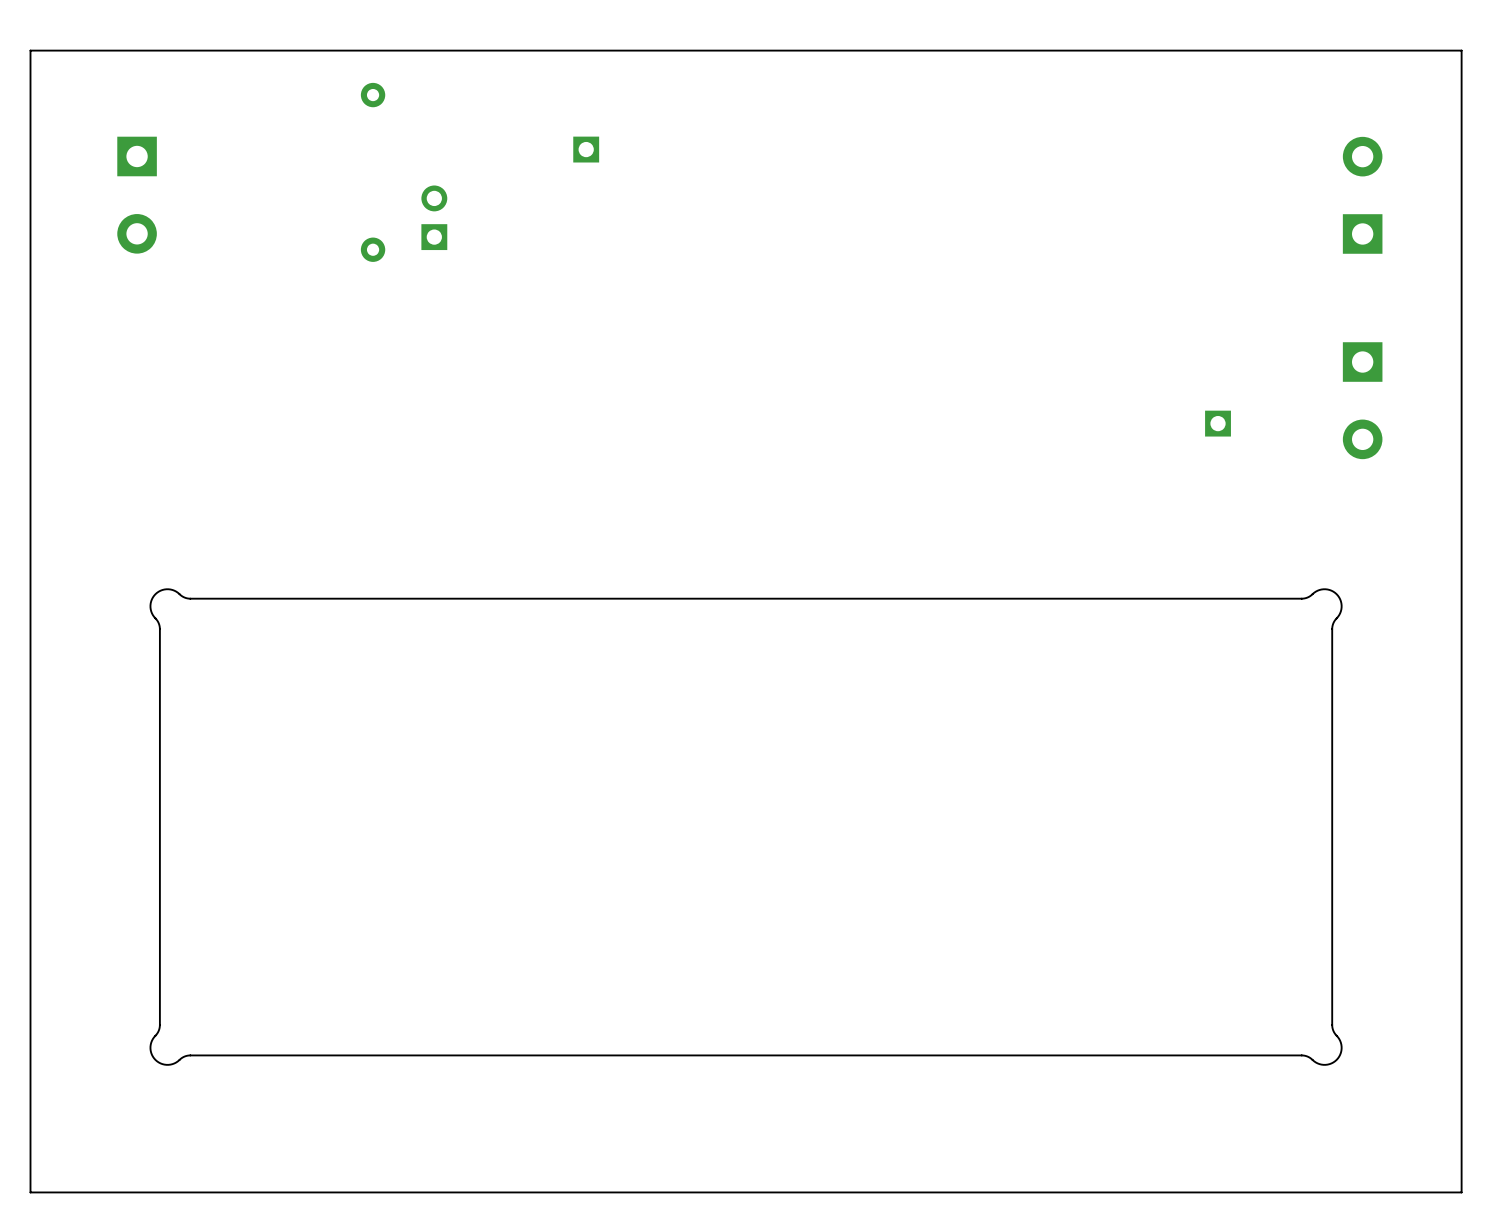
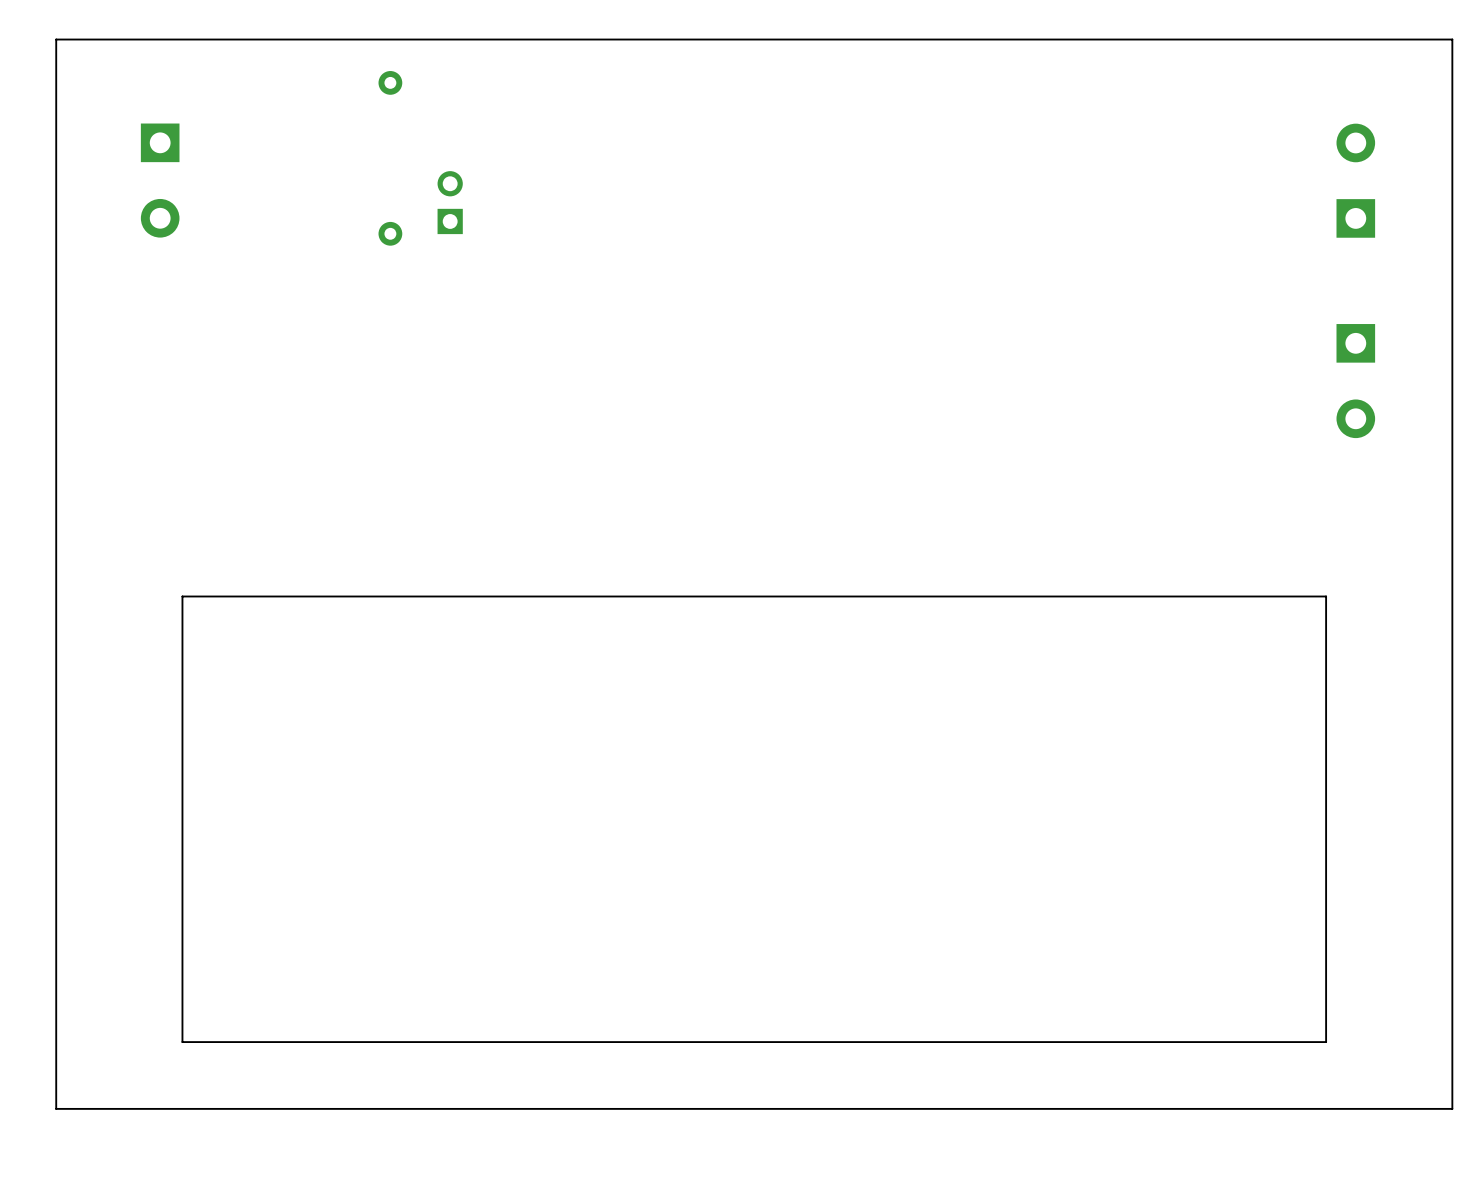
part: (586, 149) -> none
part: (1218, 423) -> none
part: (746, 827) -> none
part: none -> (754, 819)
board edge: (1461, 1146) (1461, 1192) (30, 1192) (30, 1146) -> (1452, 1108) (56, 1108)

